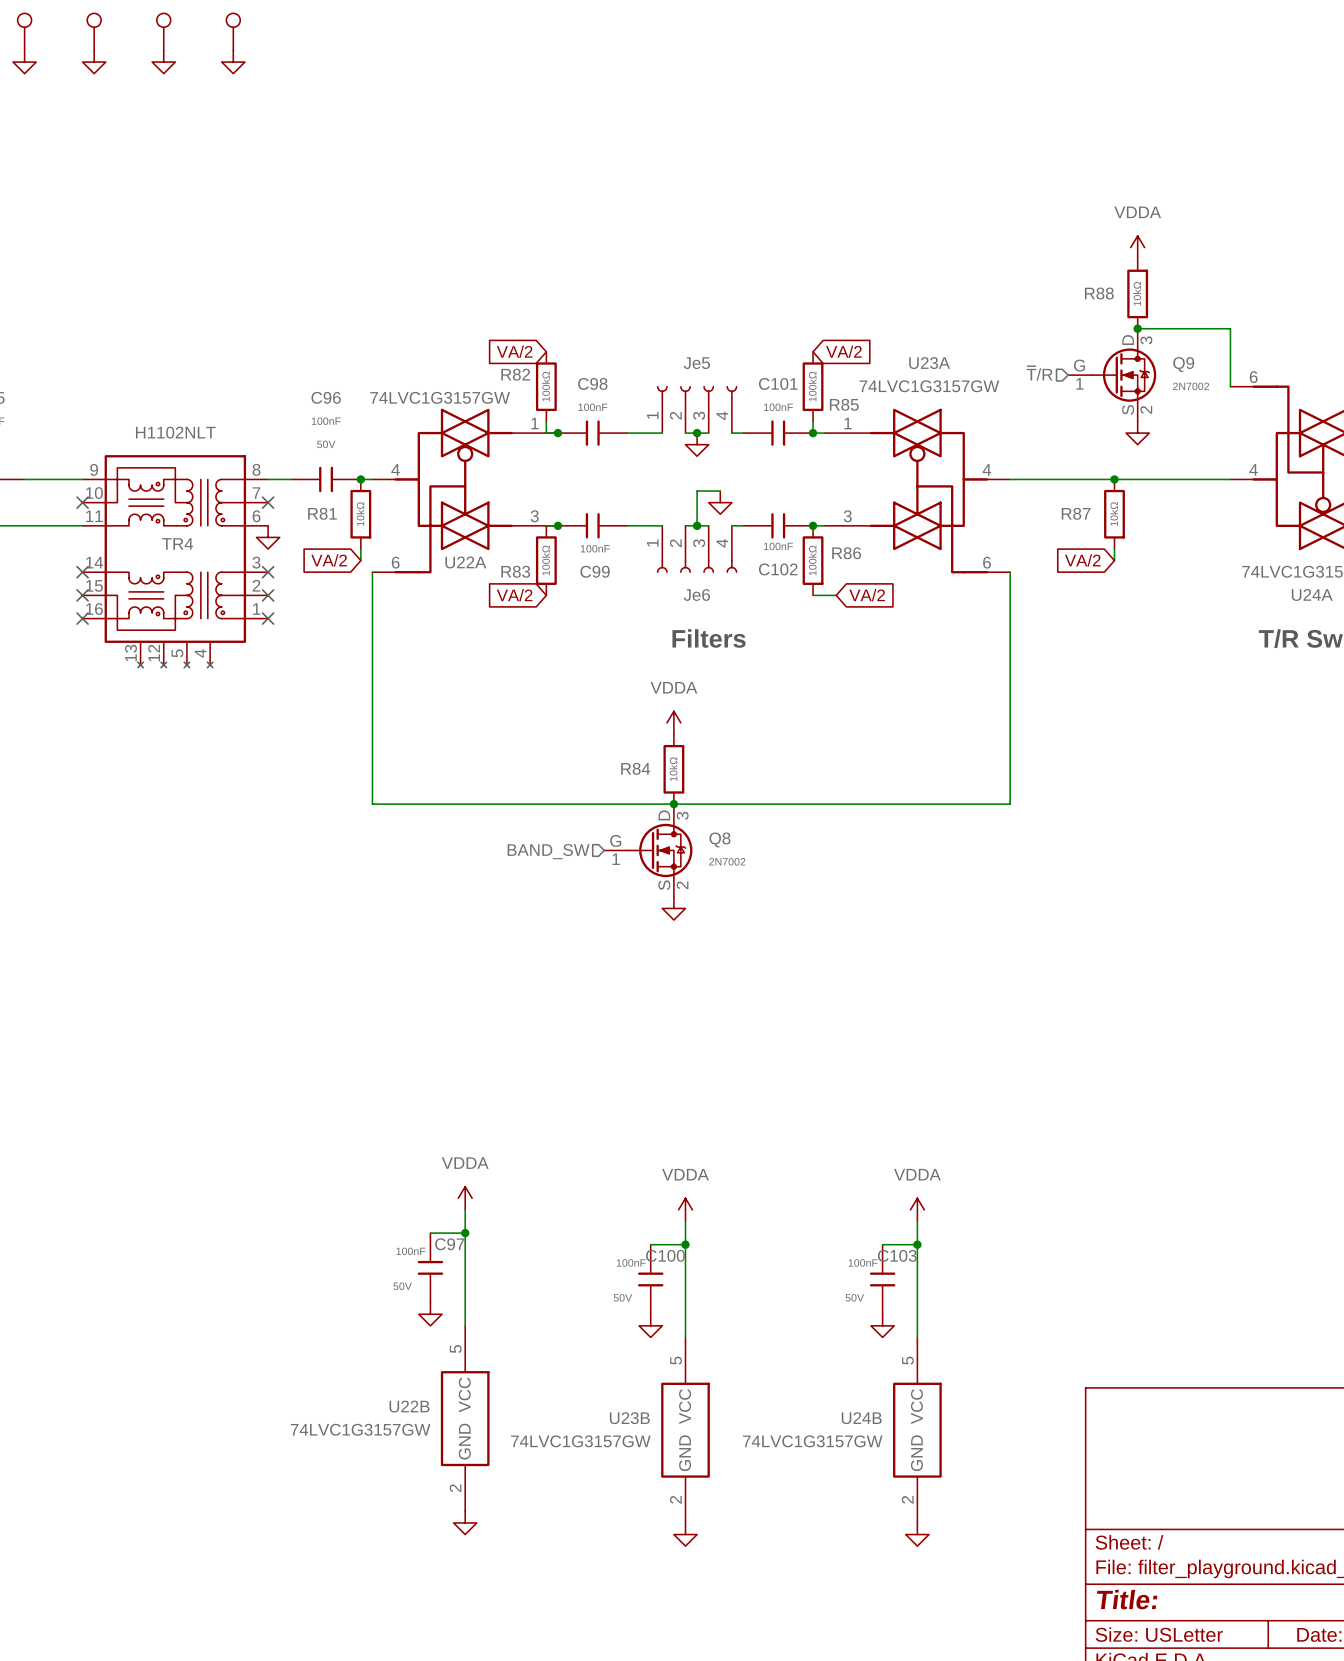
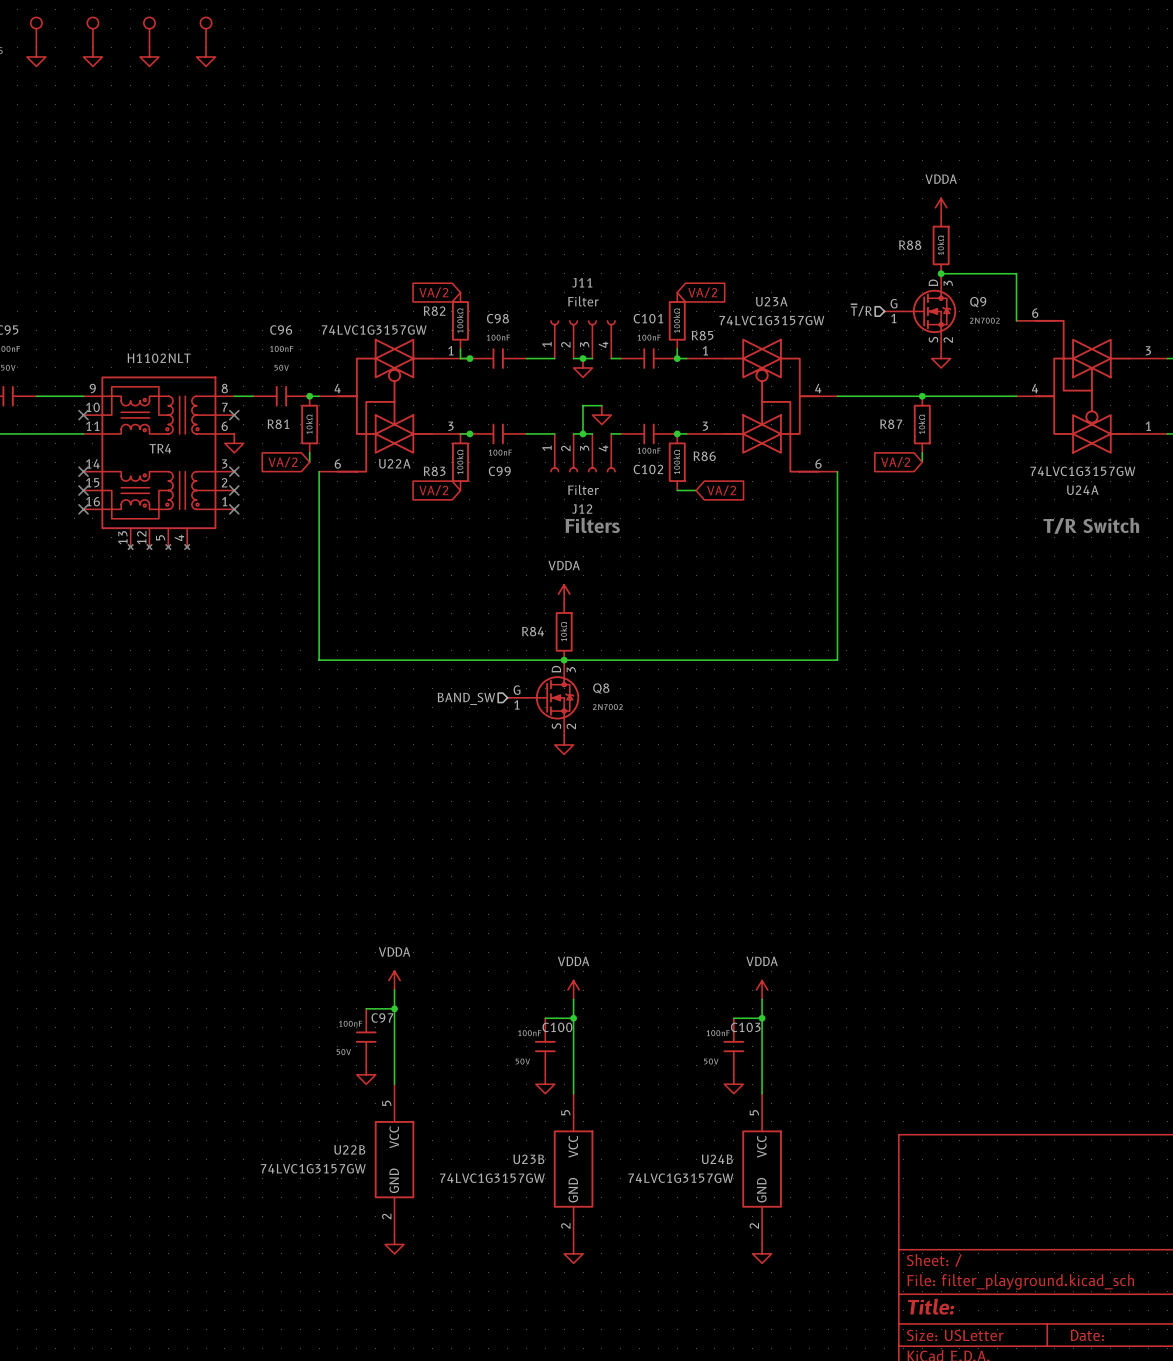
Je5 value: none -> Filter (583, 301)
Je5 name: Je5 (696, 363) -> J11 (582, 282)
Je6 name: Je6 (696, 594) -> J12 (582, 509)
Je6 value: none -> Filter (583, 489)

